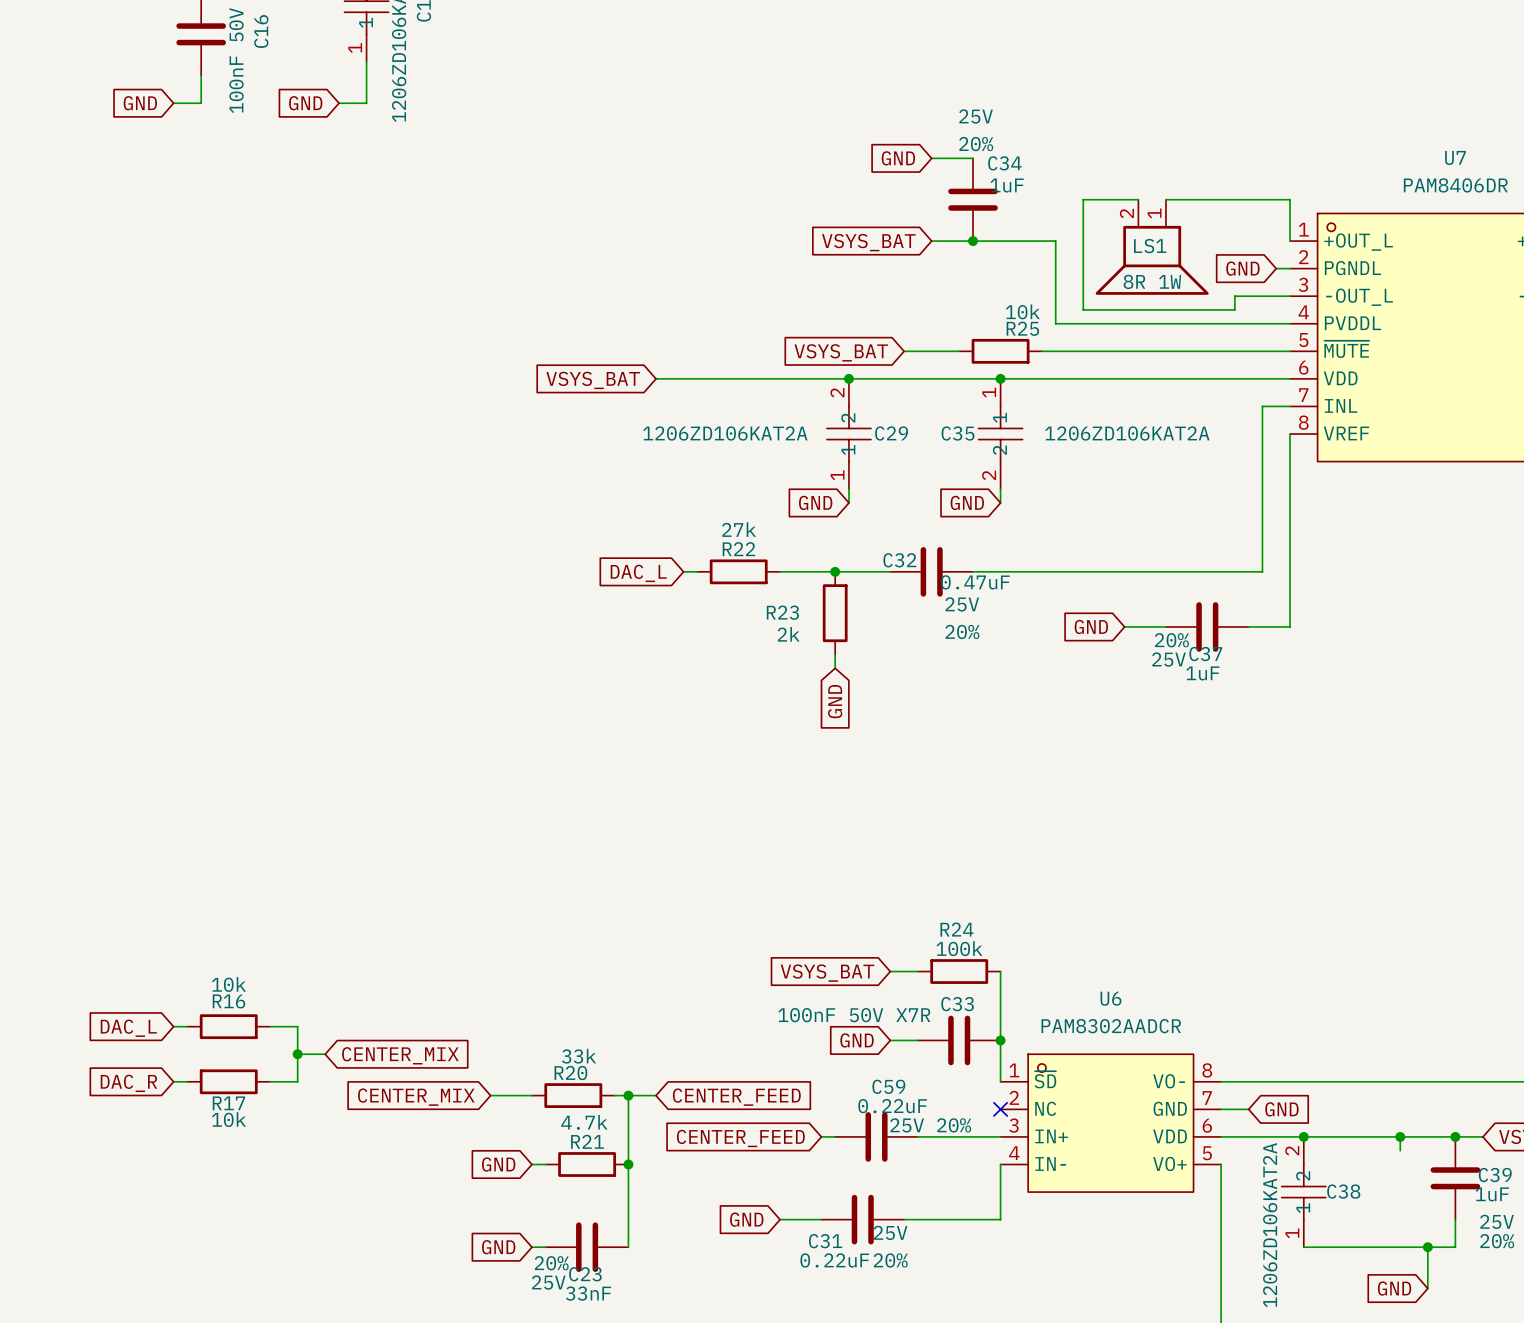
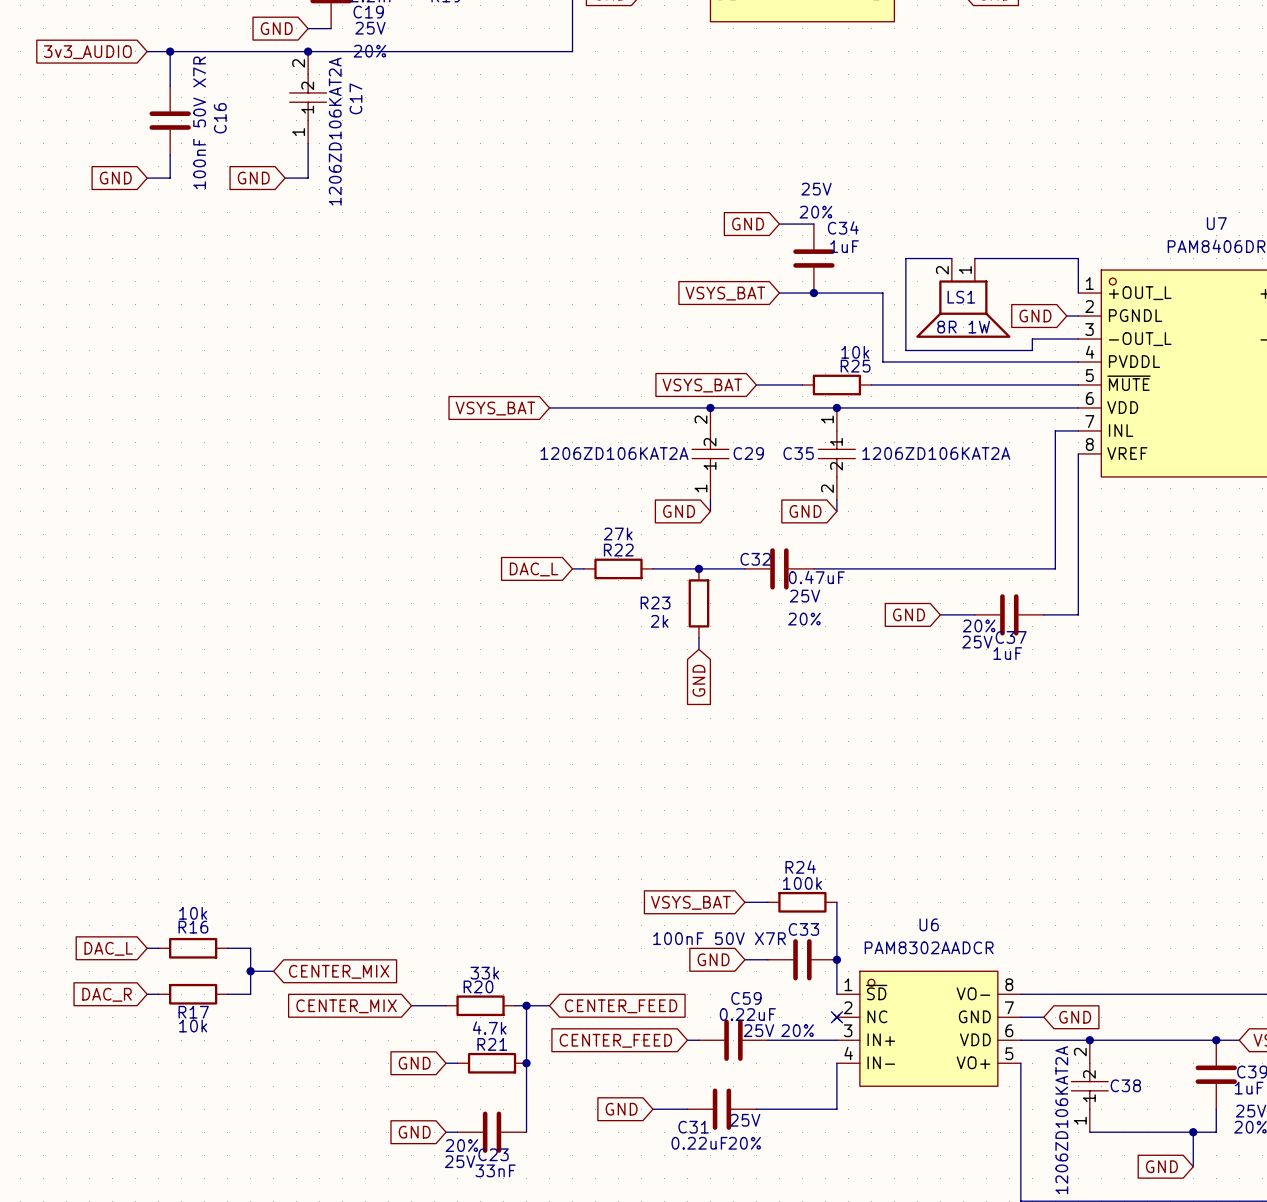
U6 symbol: [1000, 1054, 1222, 1193] -> [834, 971, 1021, 1087]
wire: (1400, 1136) (1400, 1150) -> none
junction: (1400, 1136) -> none

